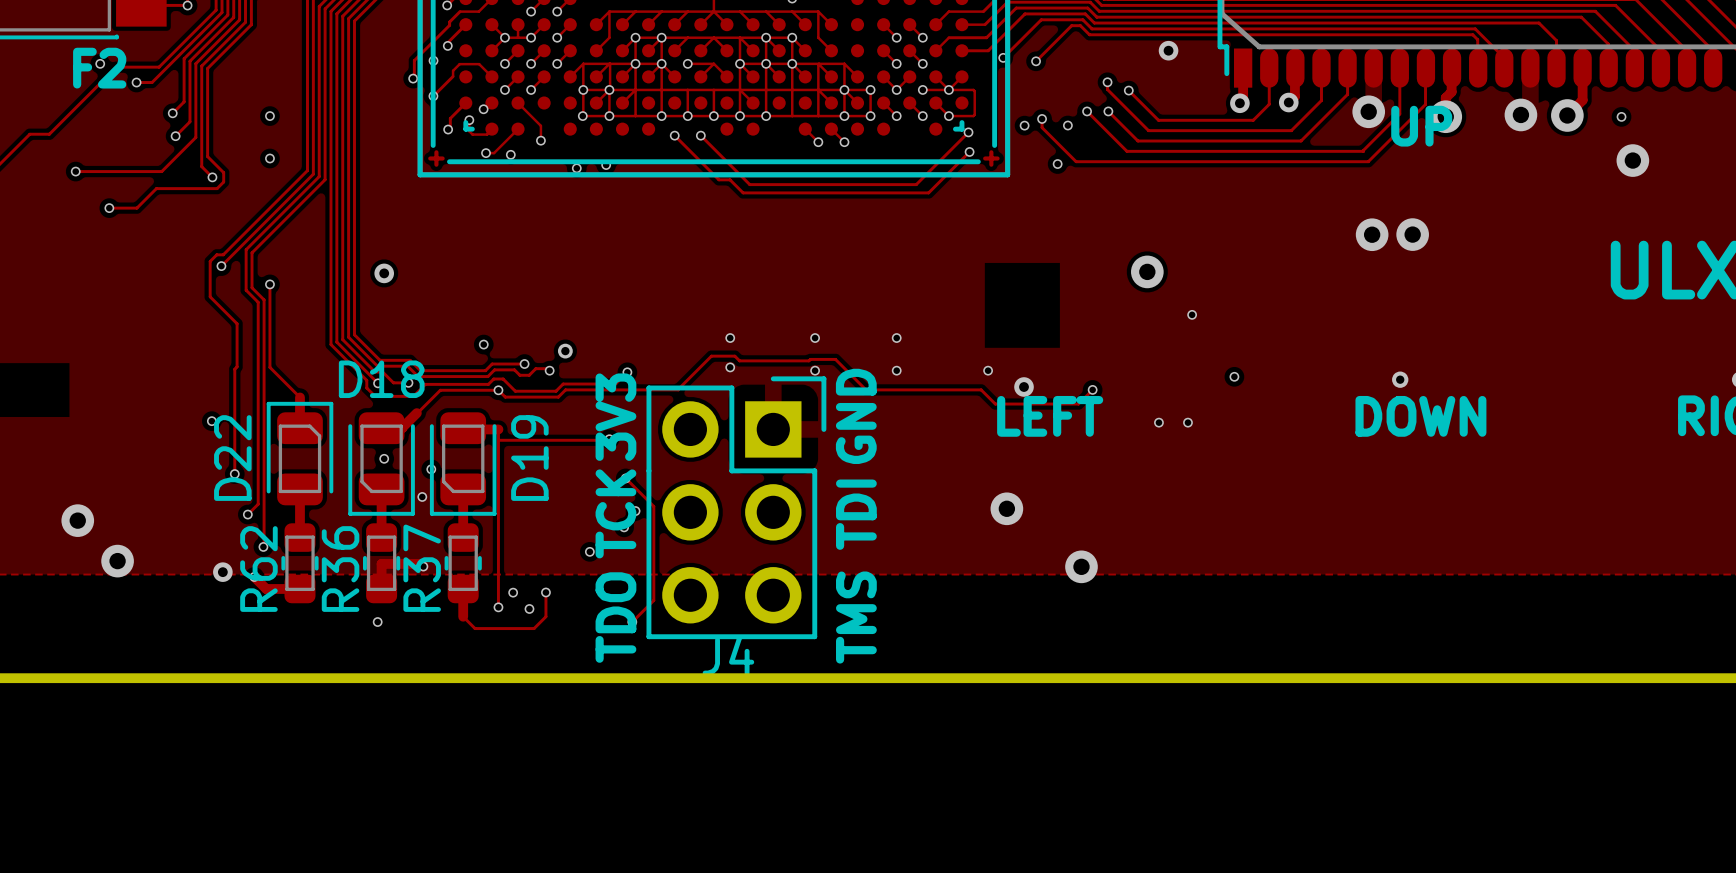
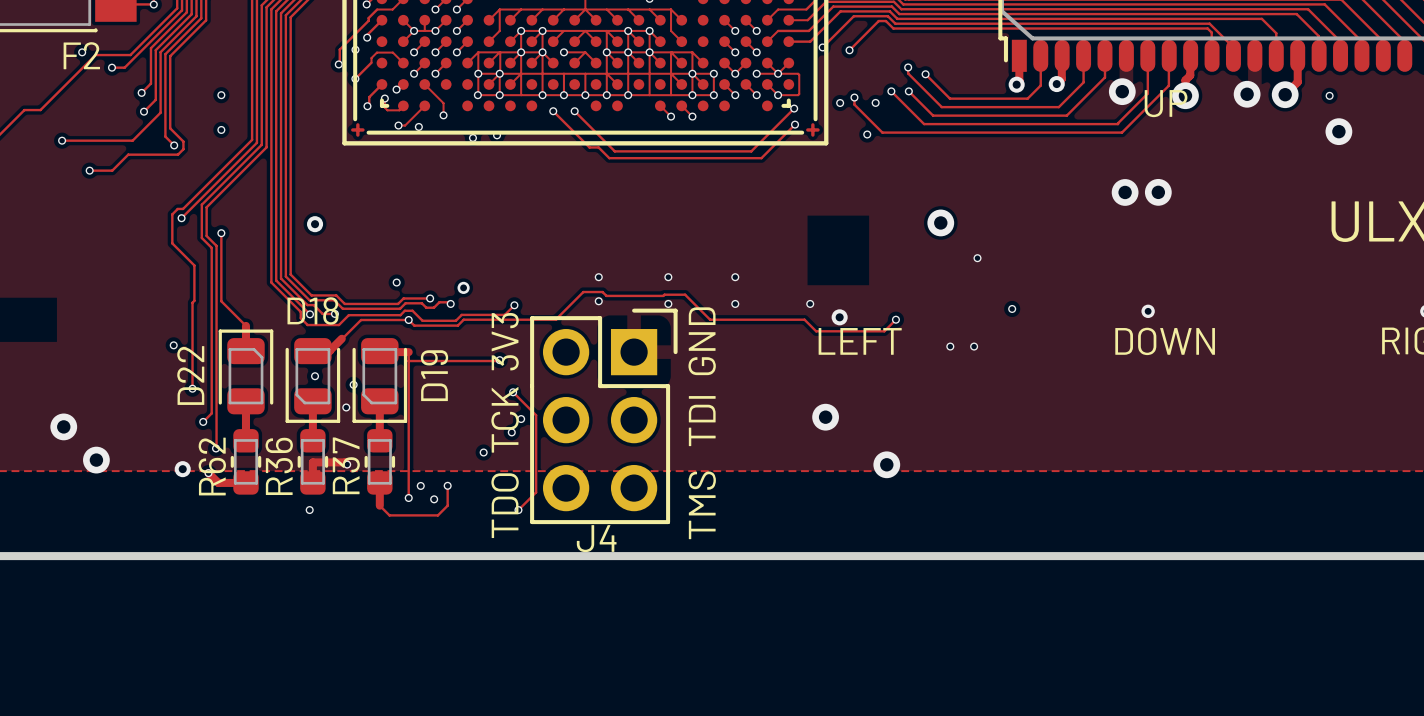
via: (1168, 50) -> none

